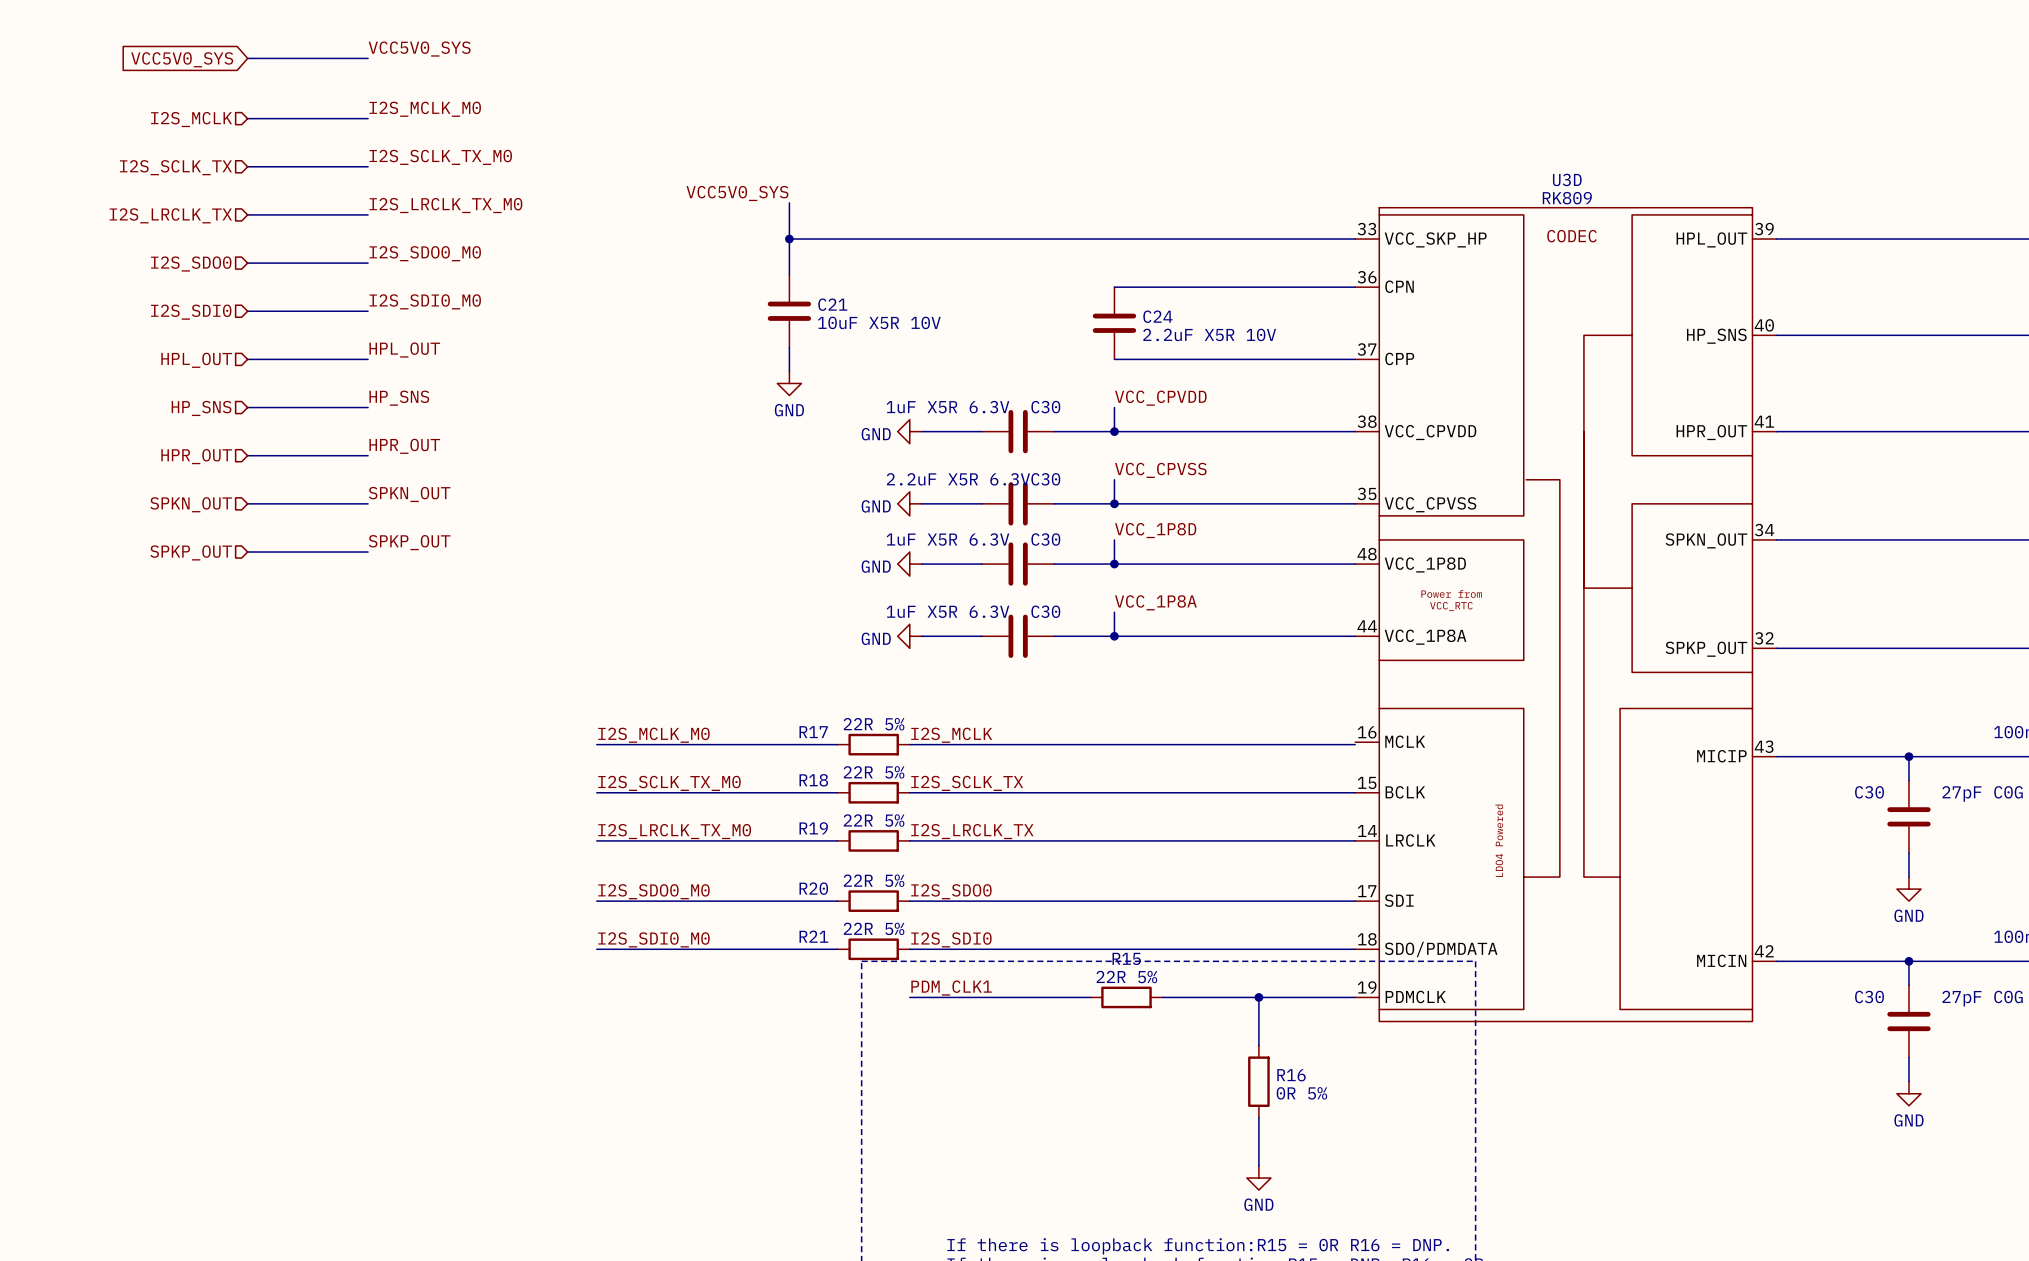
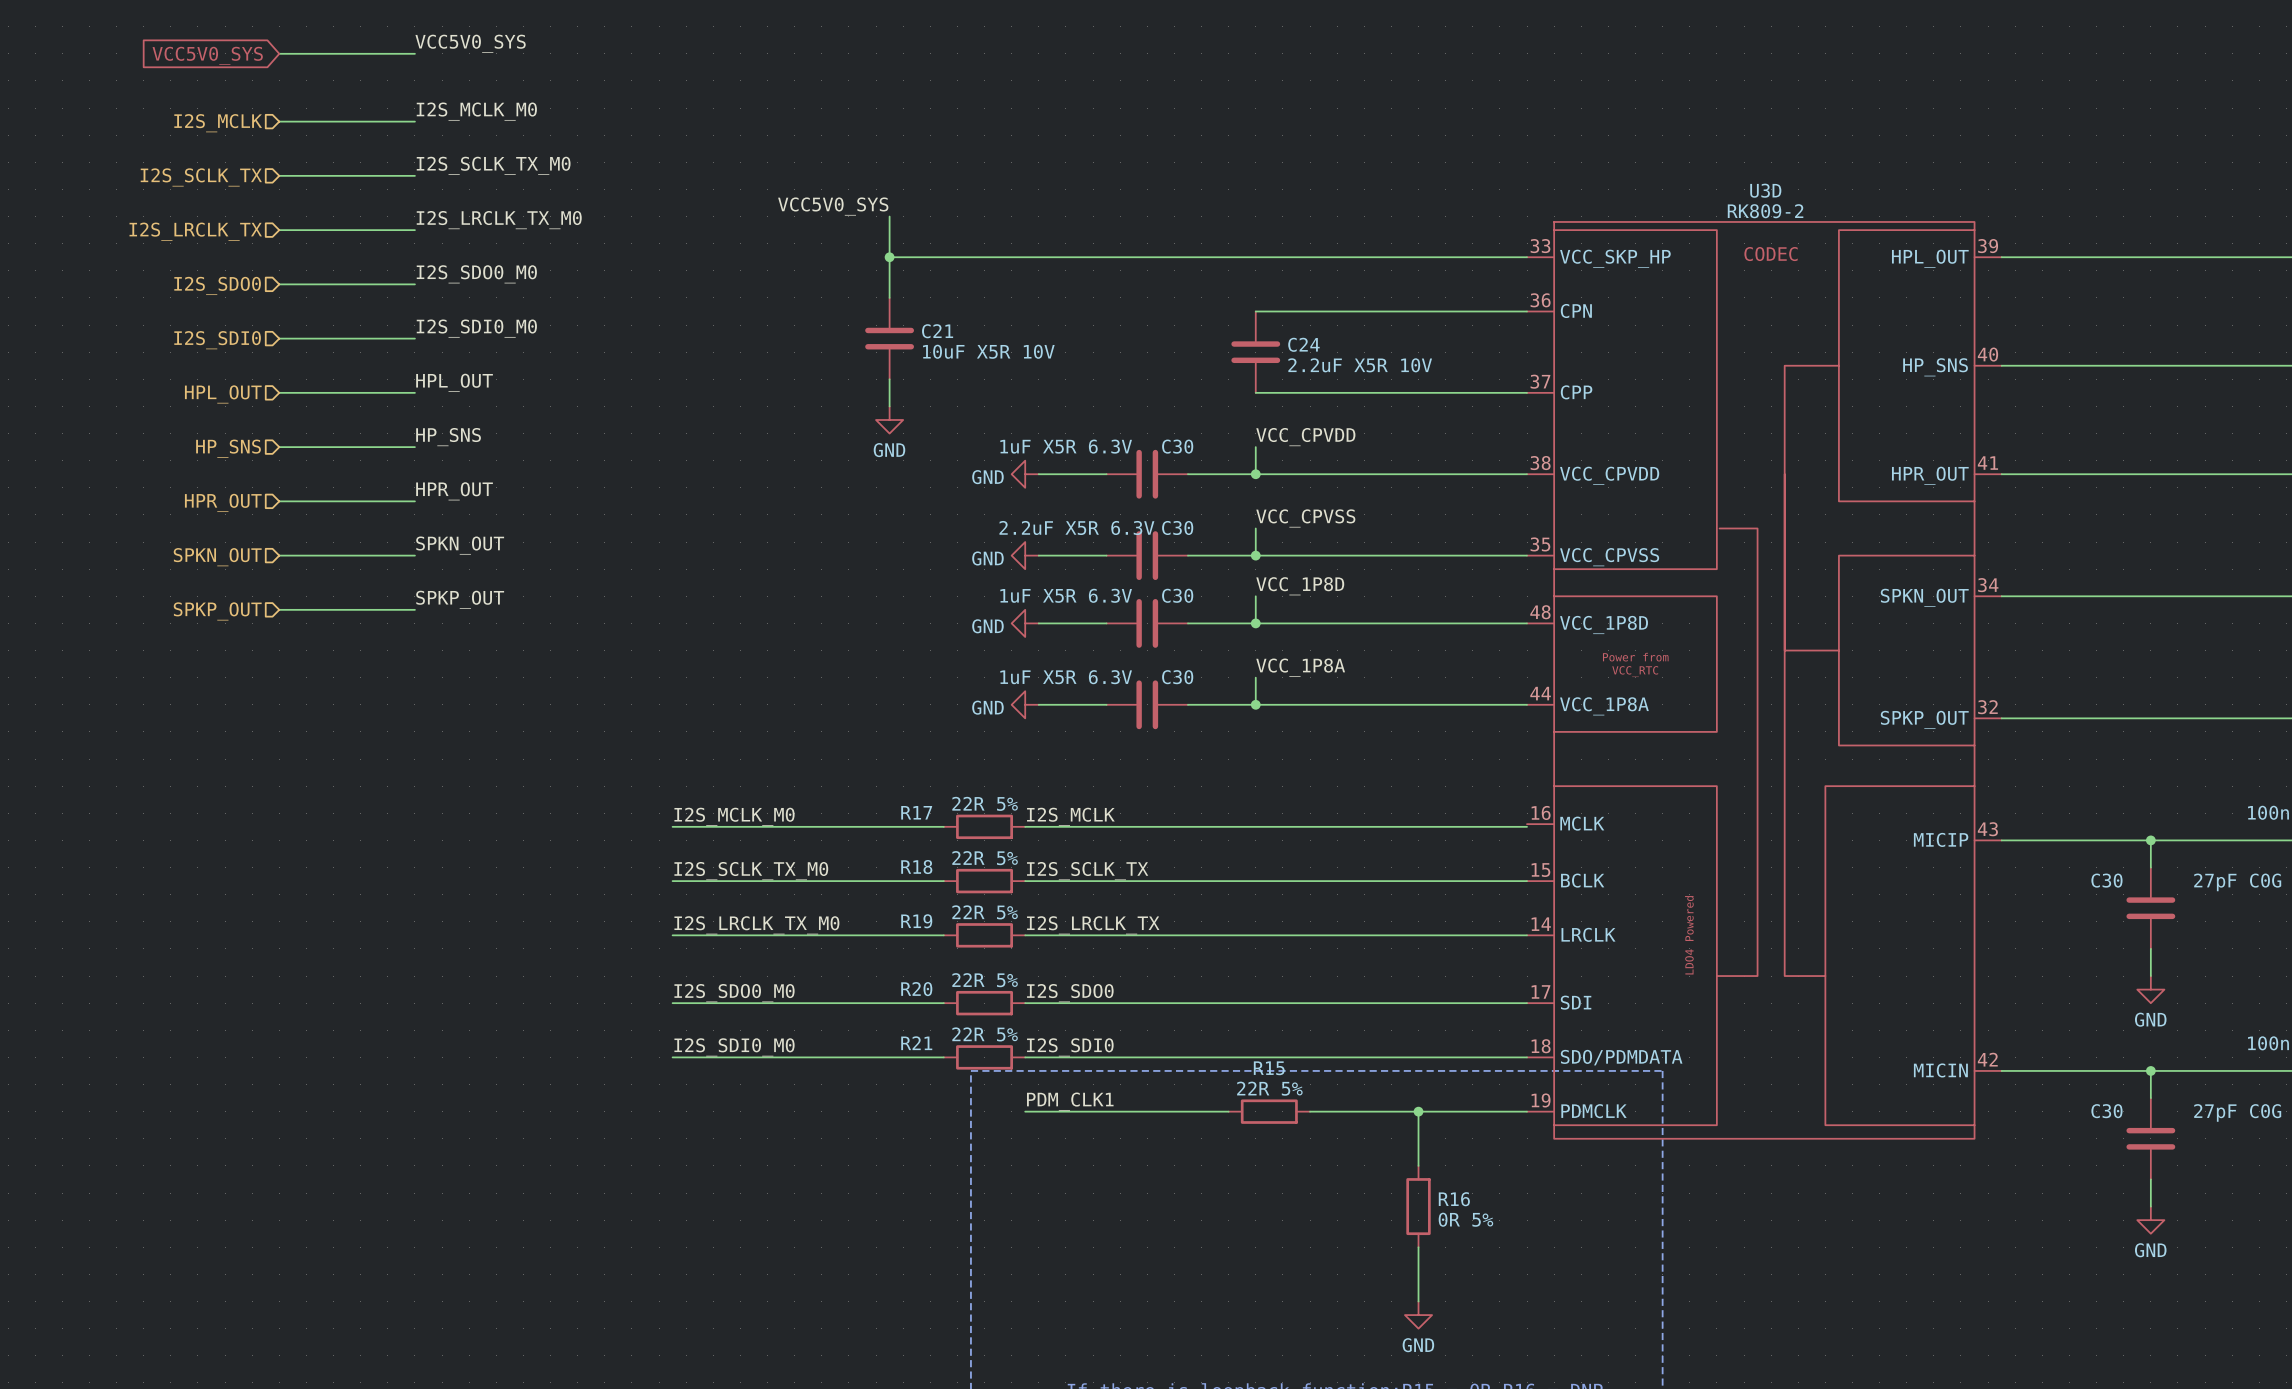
U3D value: RK809 (1567, 198) -> RK809-2 (1765, 211)

